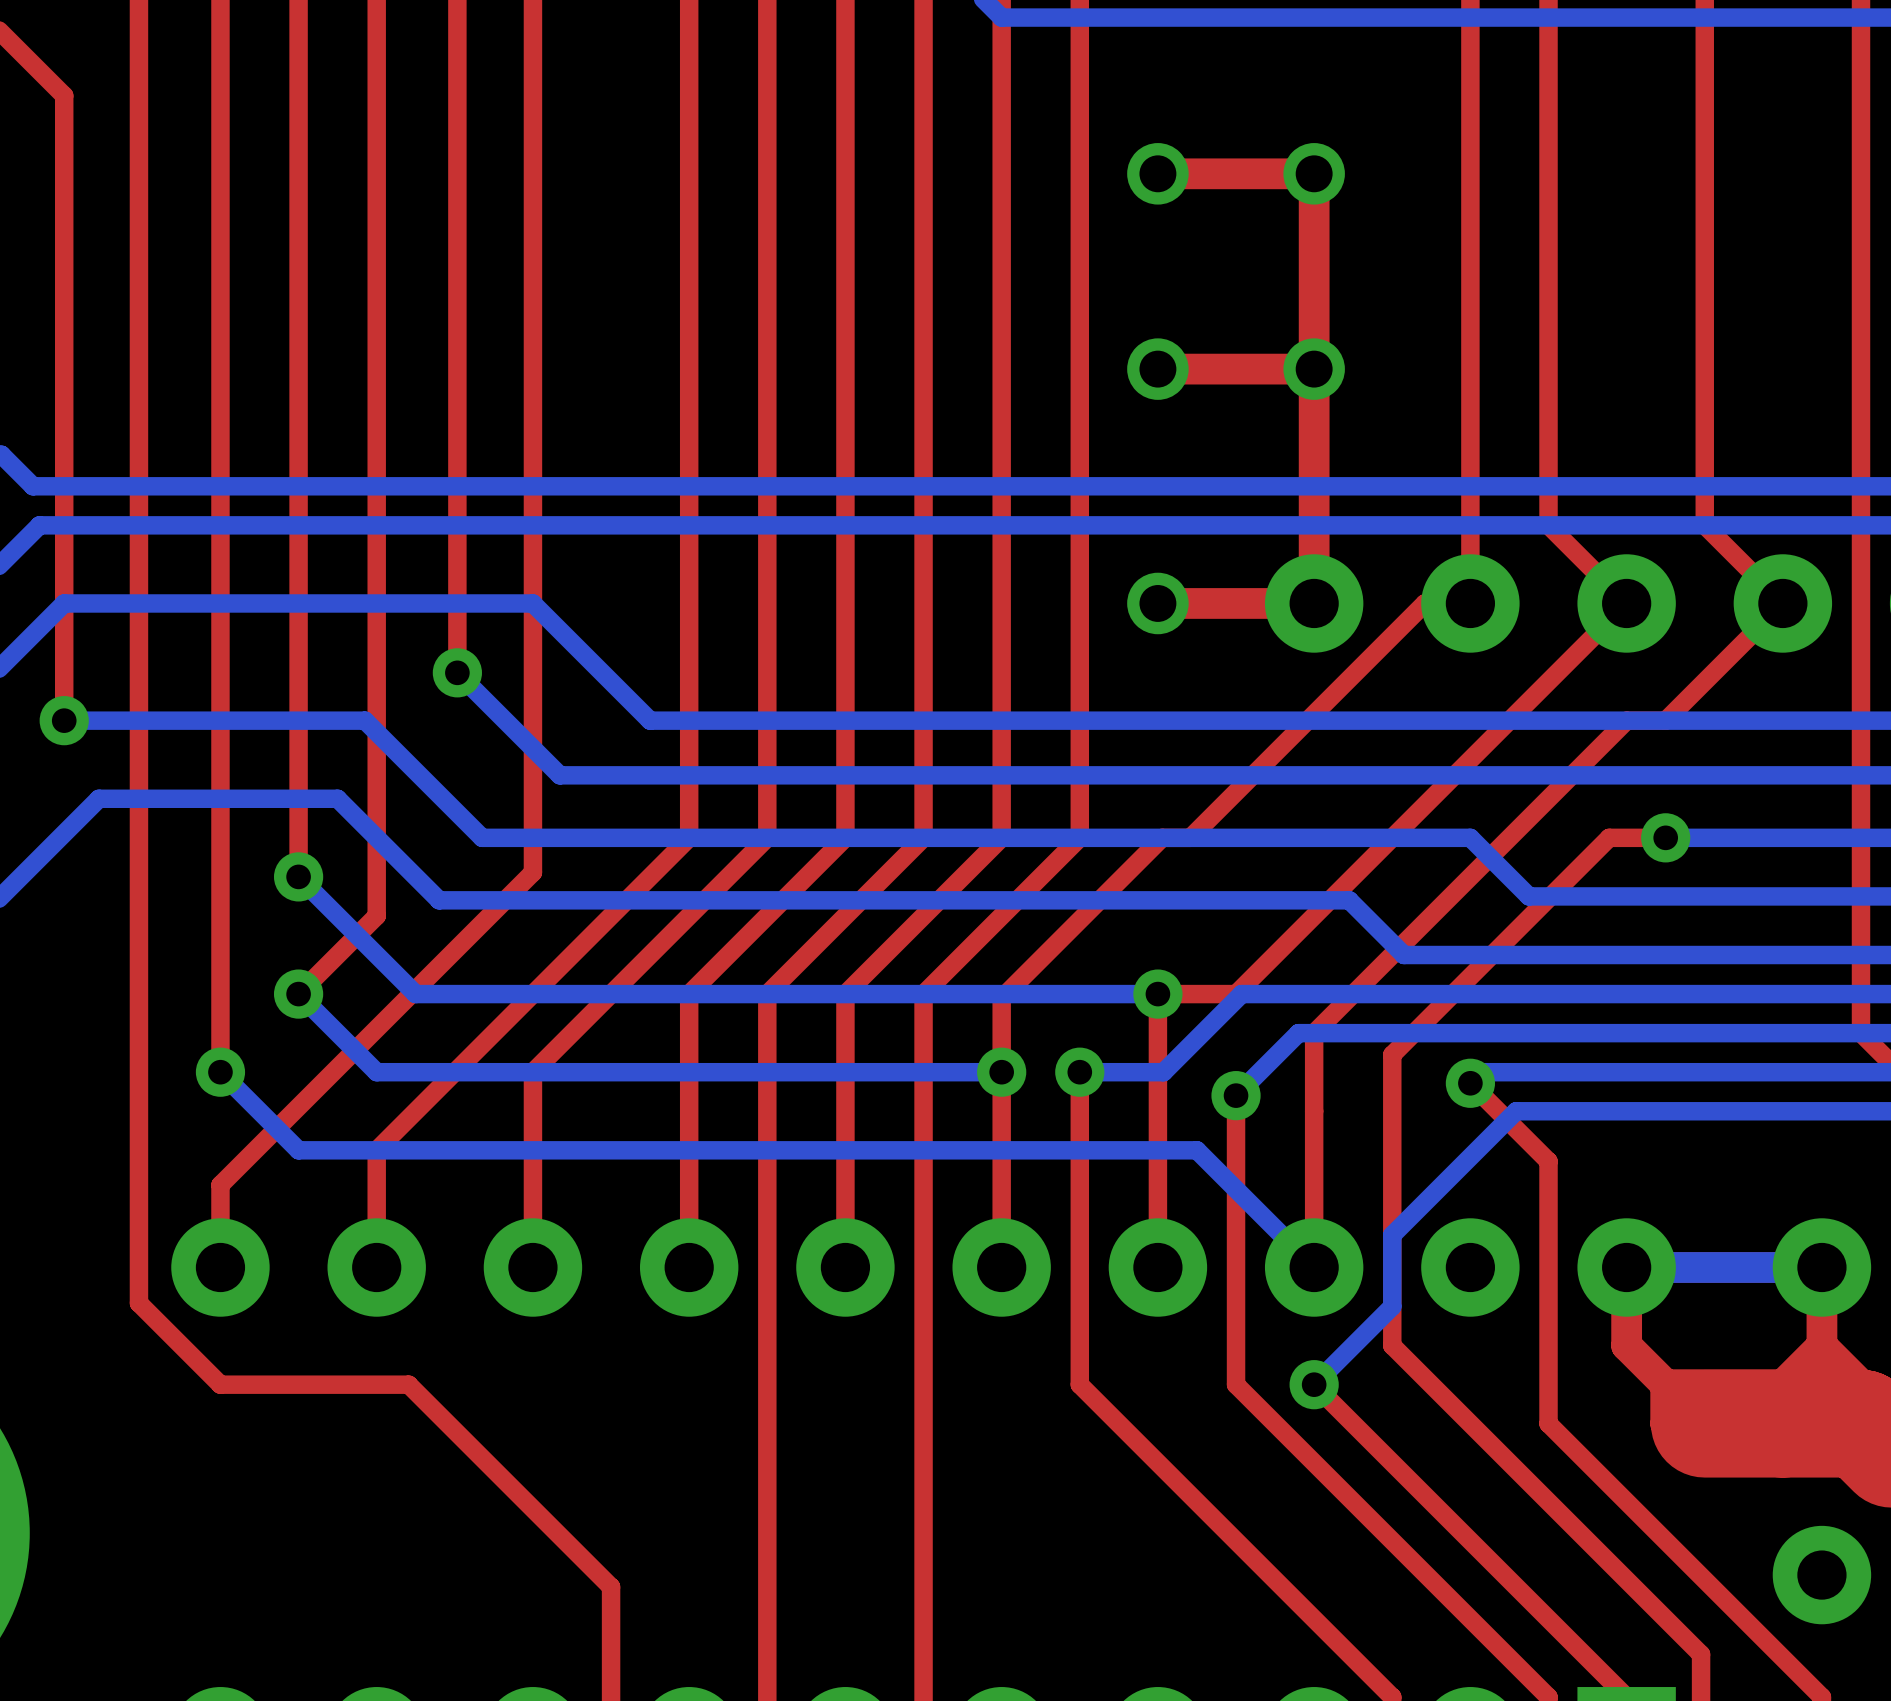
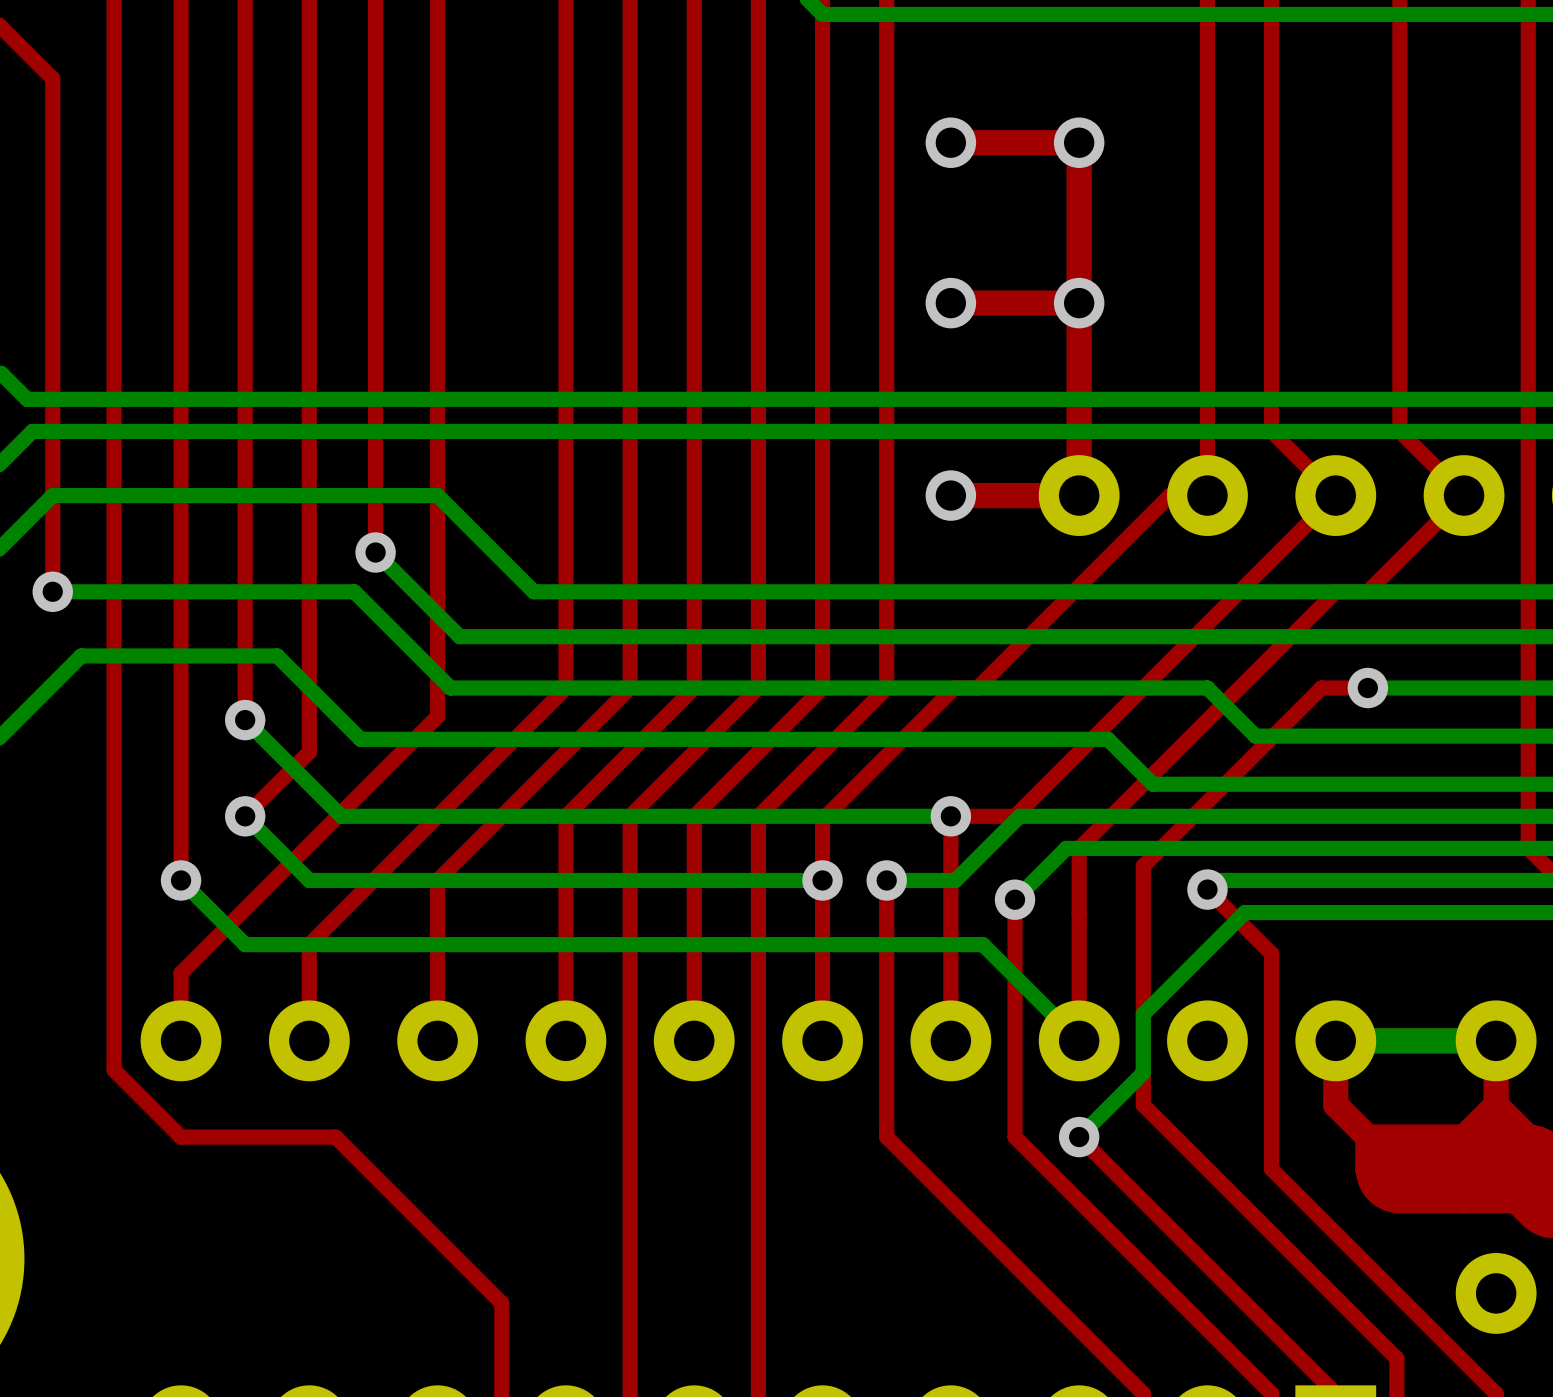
bottom track: (365, 720) (482, 837) (548, 837) -> (299, 591) (354, 591) (450, 688)

